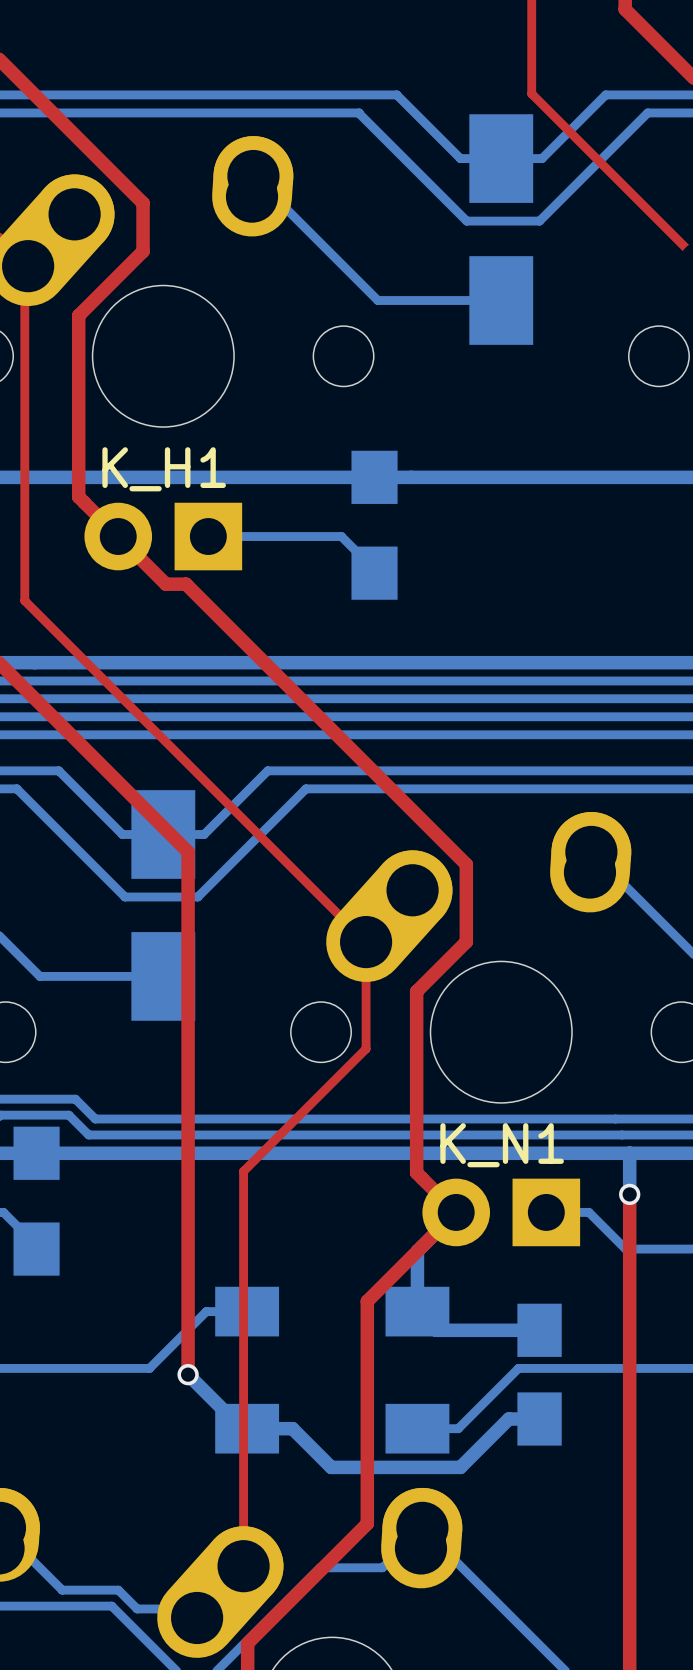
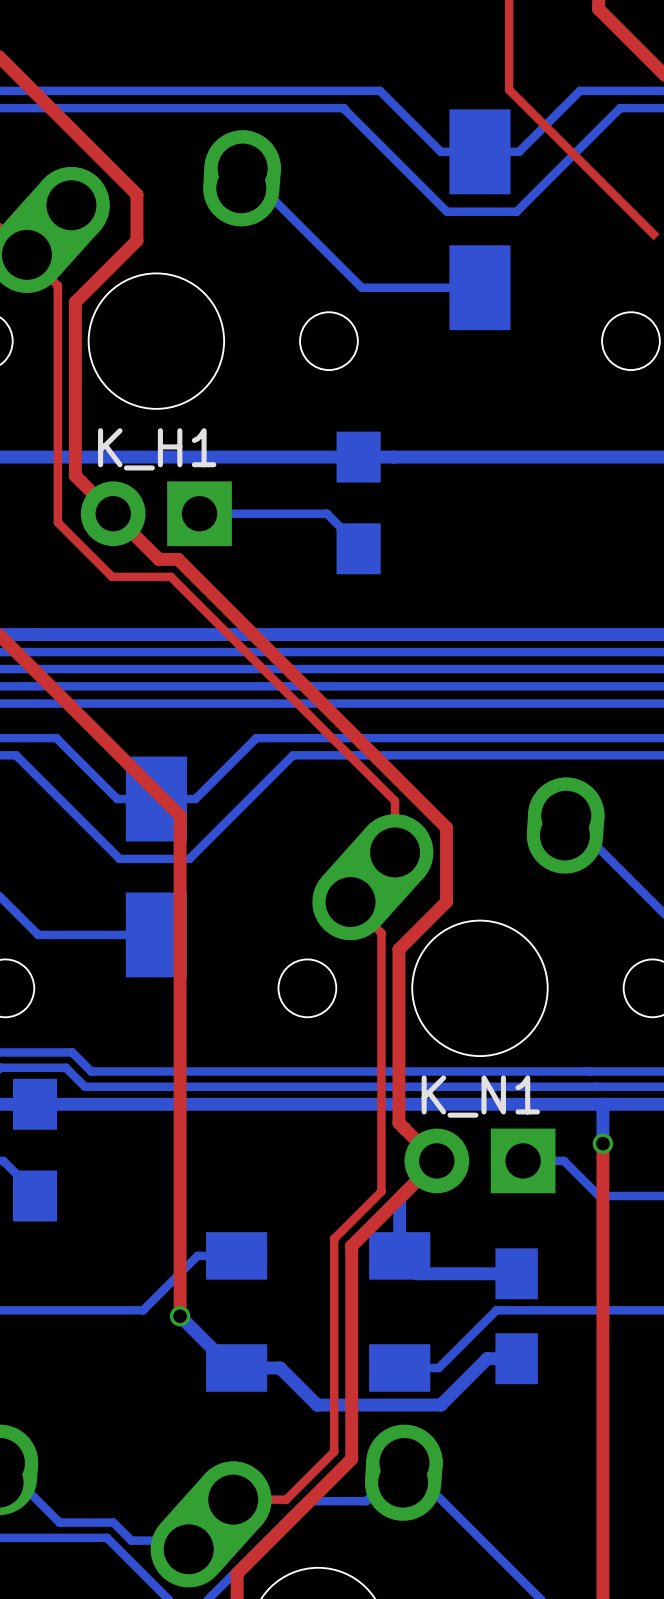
top track: none -> (26, 254) (57, 285) (57, 522) (112, 576) (170, 576) (395, 801) (395, 852)
top track: (24, 269) (24, 600) (366, 942) (366, 1048) (243, 1171) (243, 1566) -> (350, 902) (381, 932) (381, 1191) (334, 1238) (334, 1451) (286, 1499) (233, 1499)

